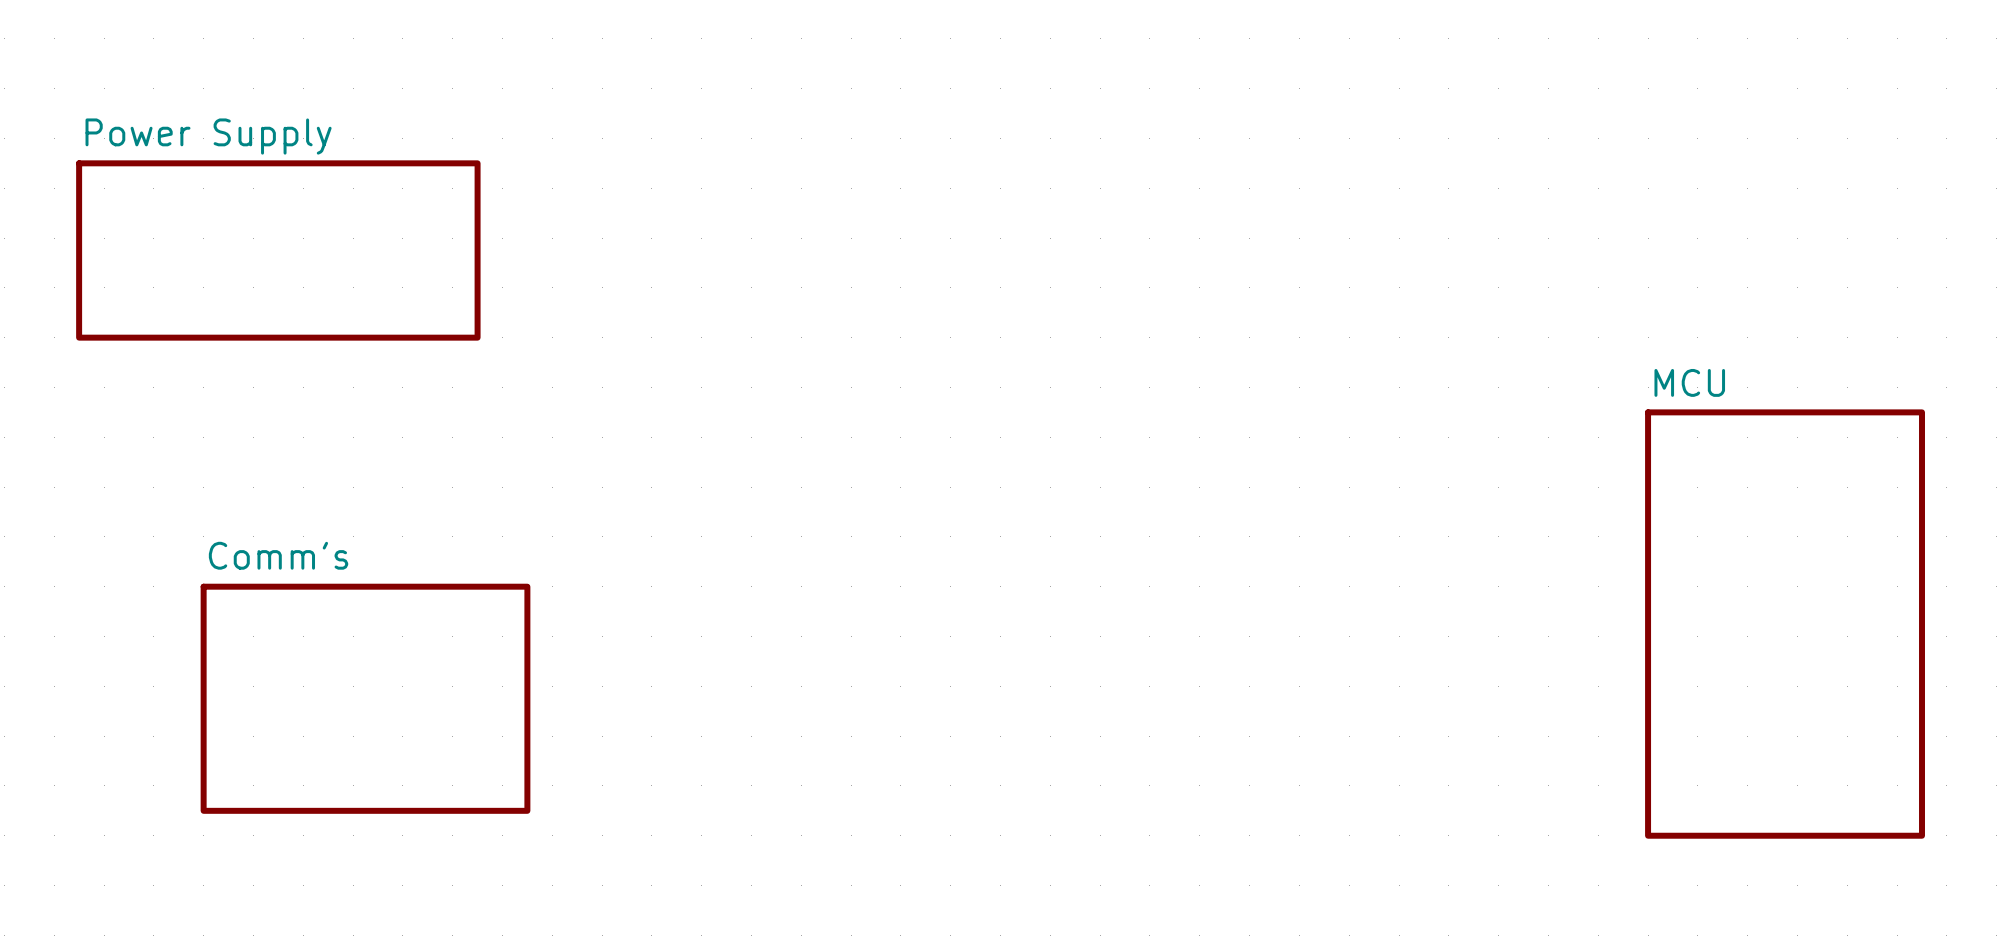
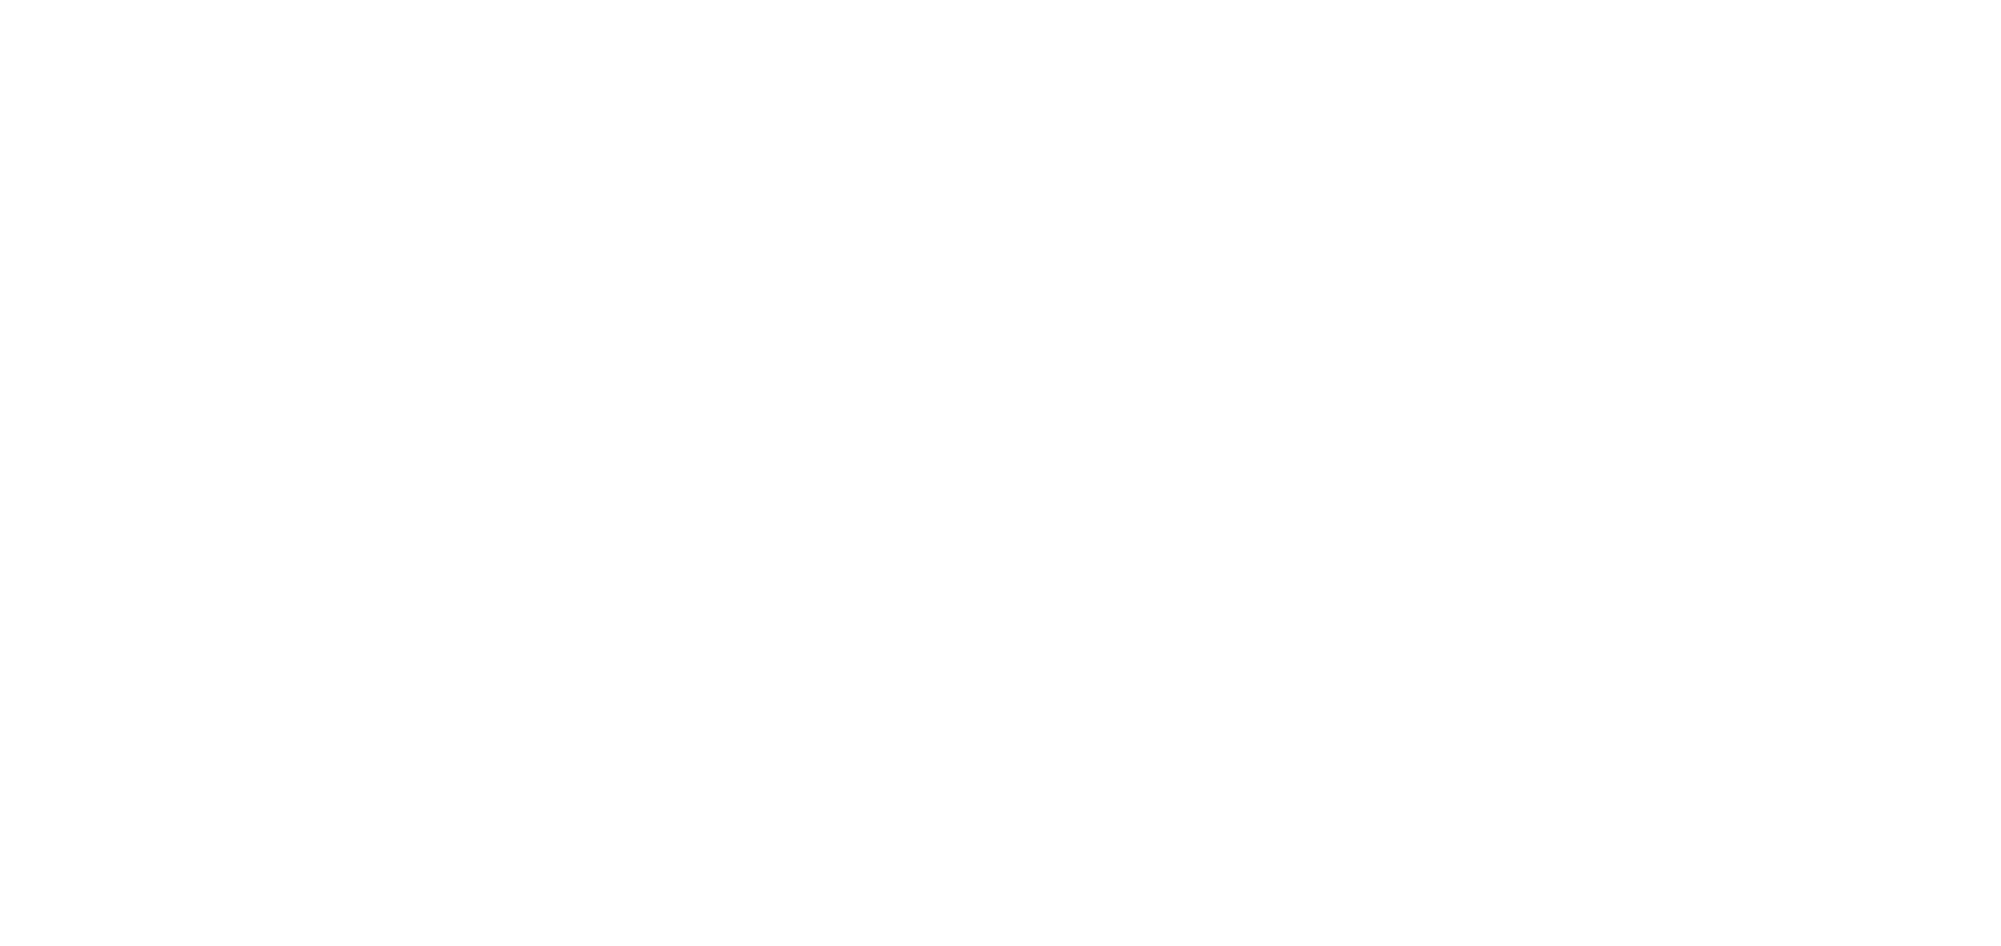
sheet Power Supply: (278, 250) -> none
sheet MCU: (1785, 624) -> none
sheet Comm's: (365, 698) -> none

